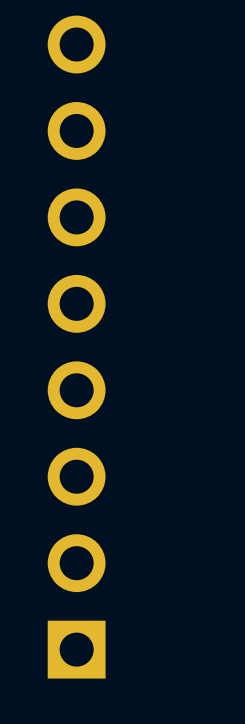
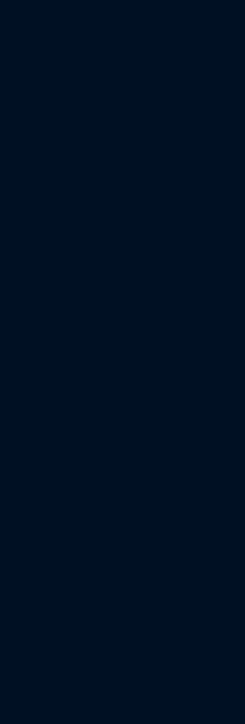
part: (76, 347) -> none

